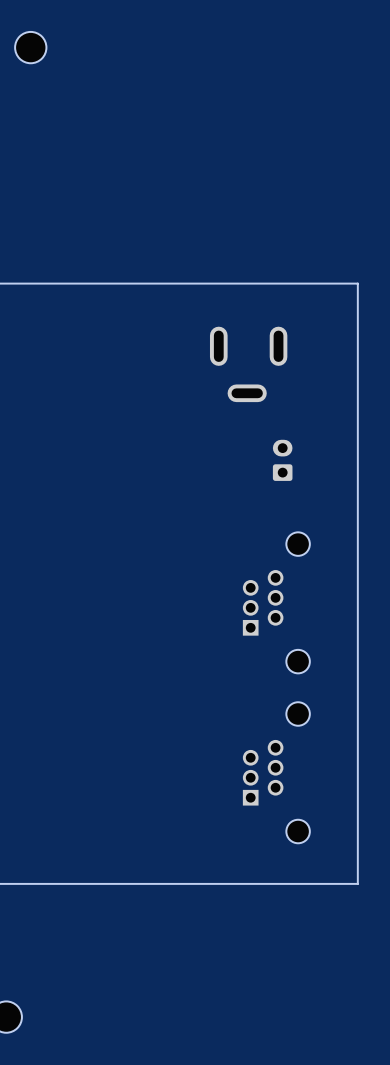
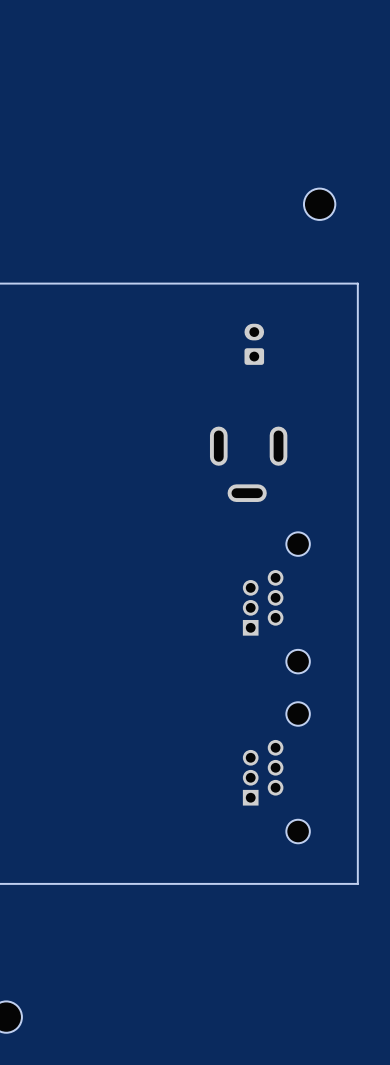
part: (30, 47) -> none
part: none -> (319, 204)
part position: (248, 364) -> (248, 464)
part position: (282, 460) -> (254, 344)

